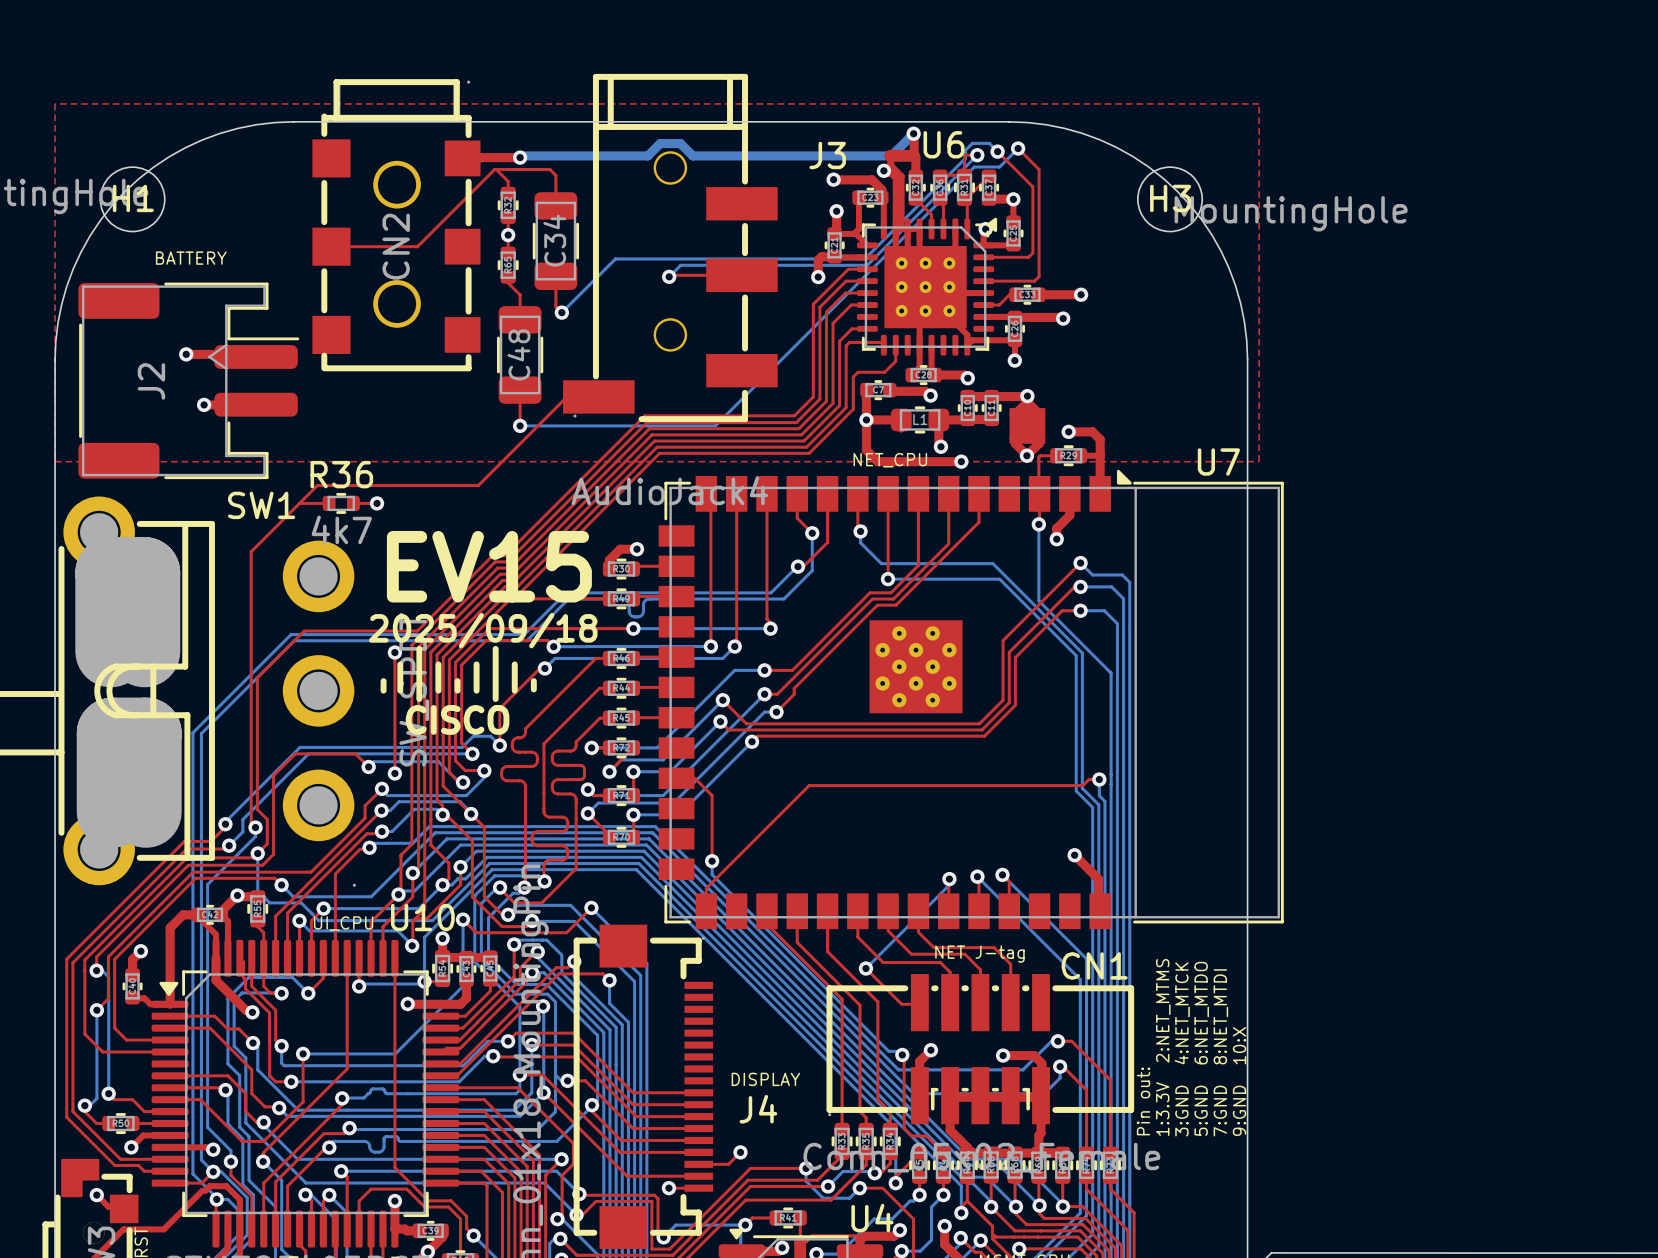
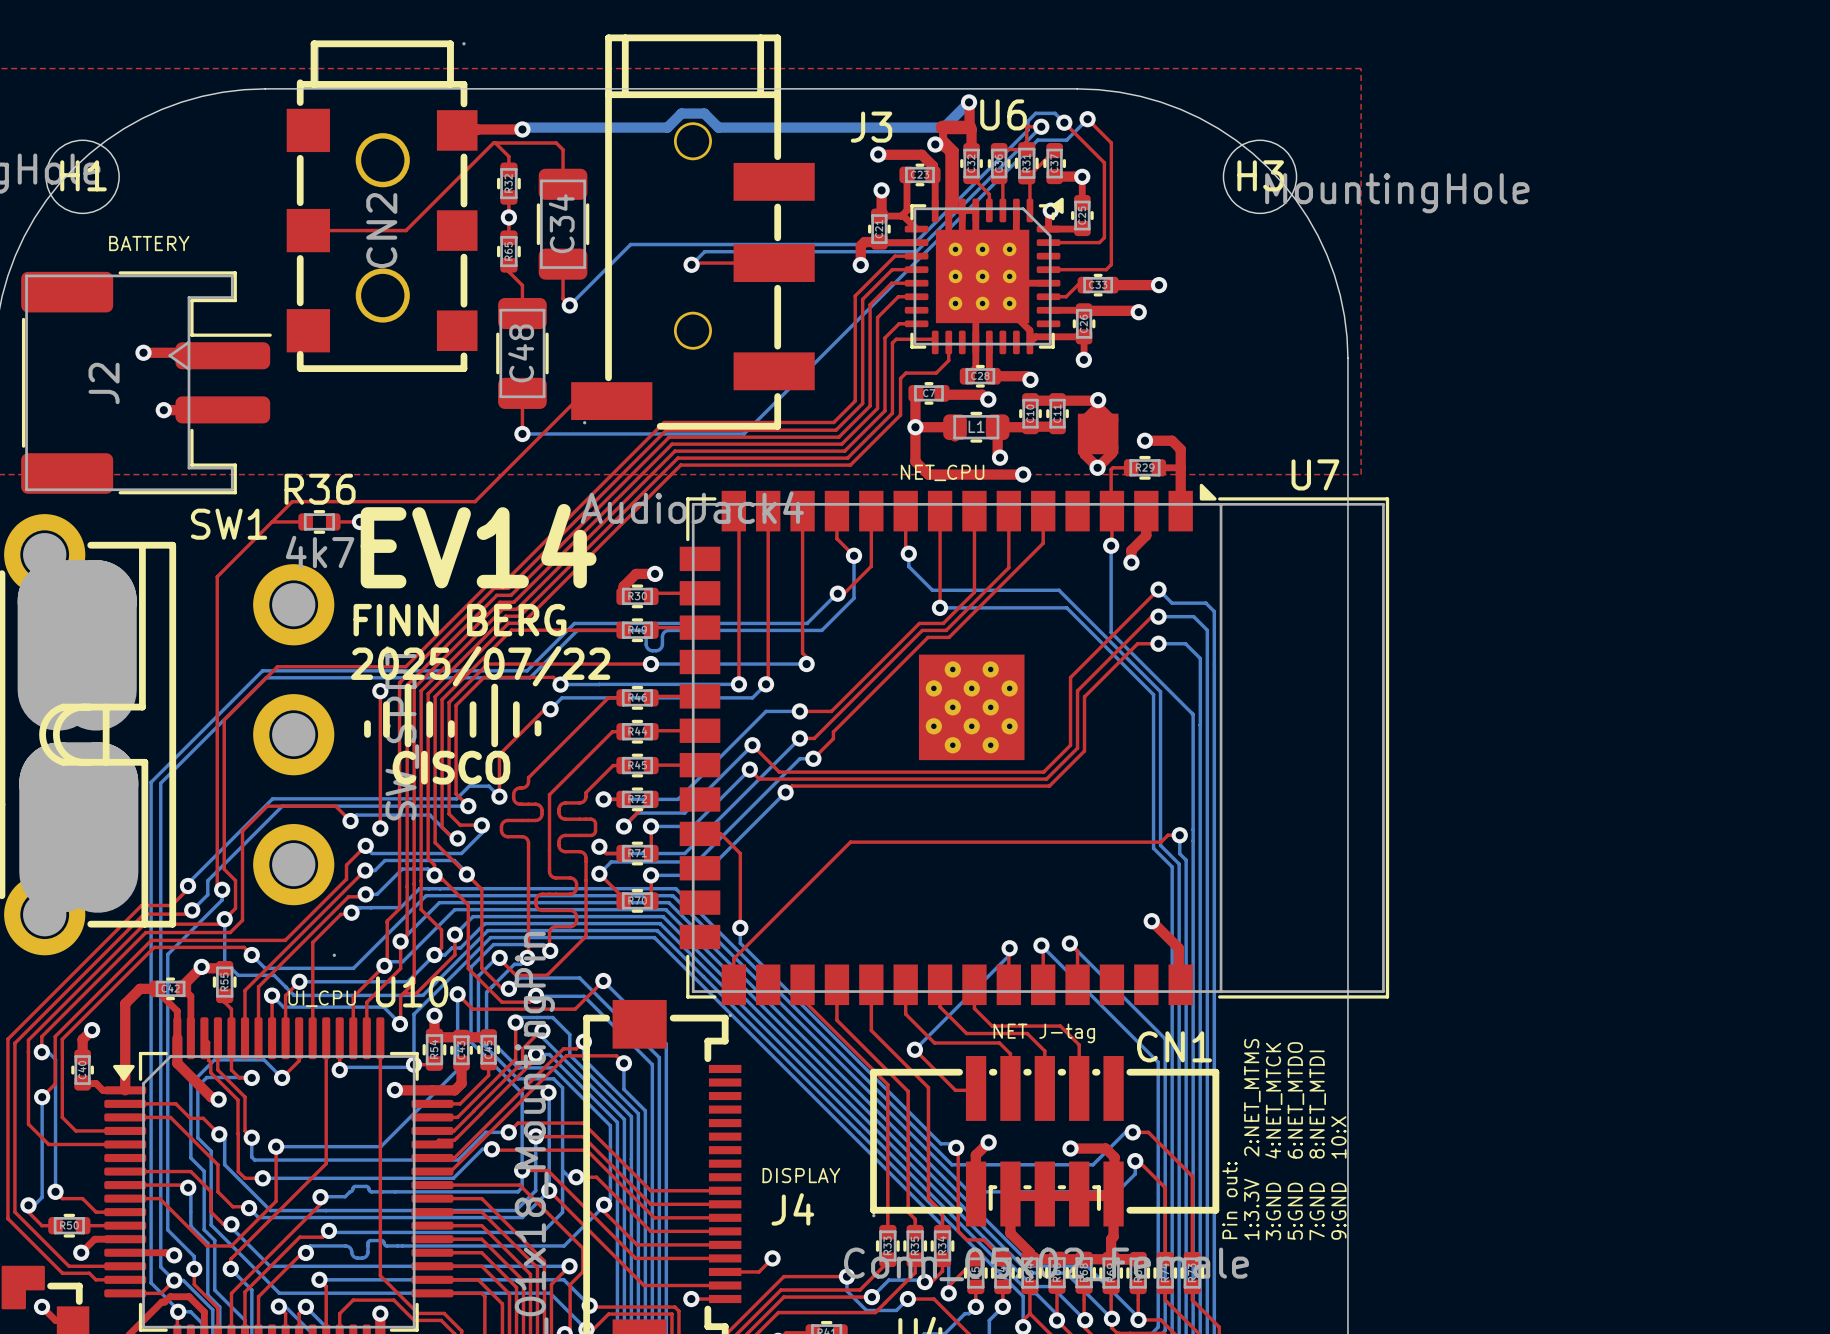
text: none -> EV14 (478, 546)
text: EV15 (489, 566) -> FINN BERG (459, 620)
text: 2025/09/18 (483, 630) -> 2025/07/22 (480, 666)

